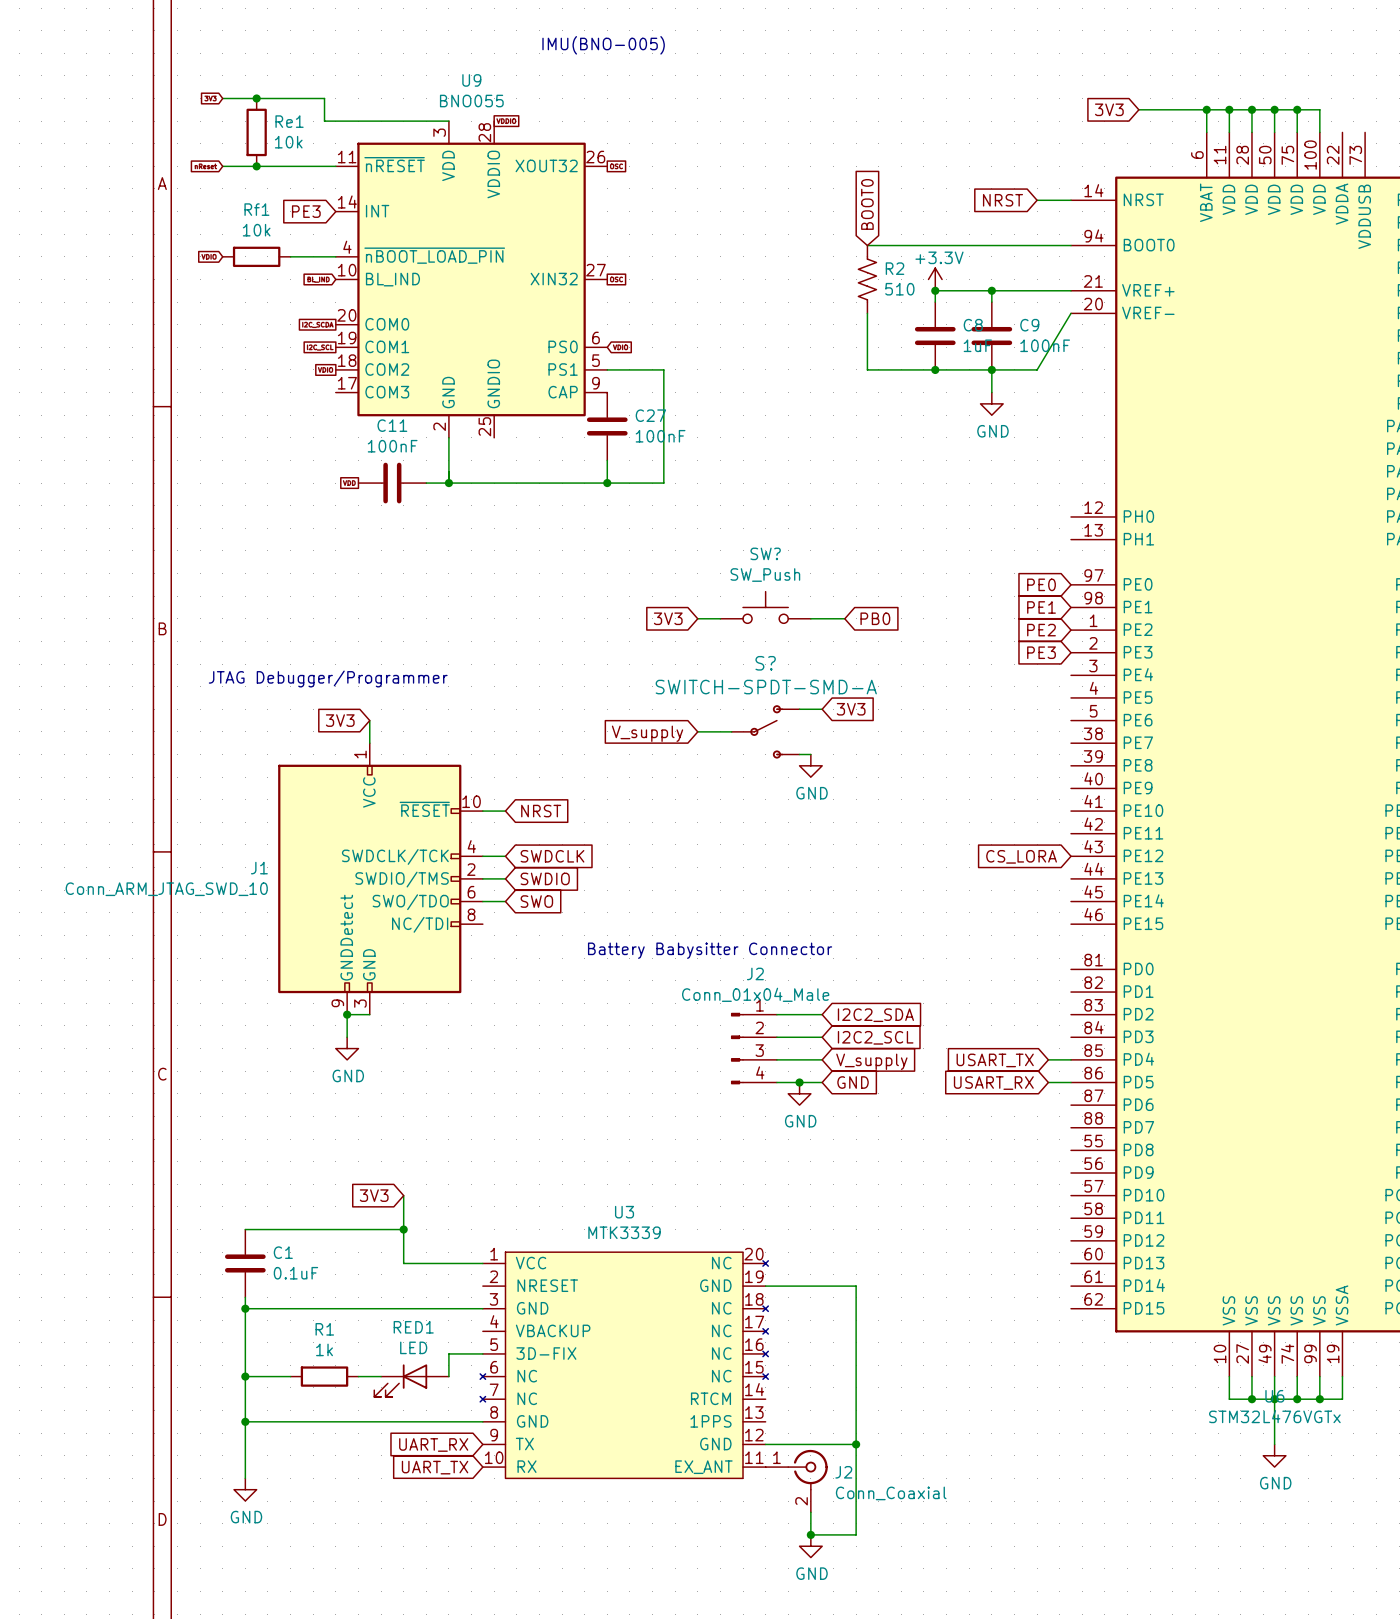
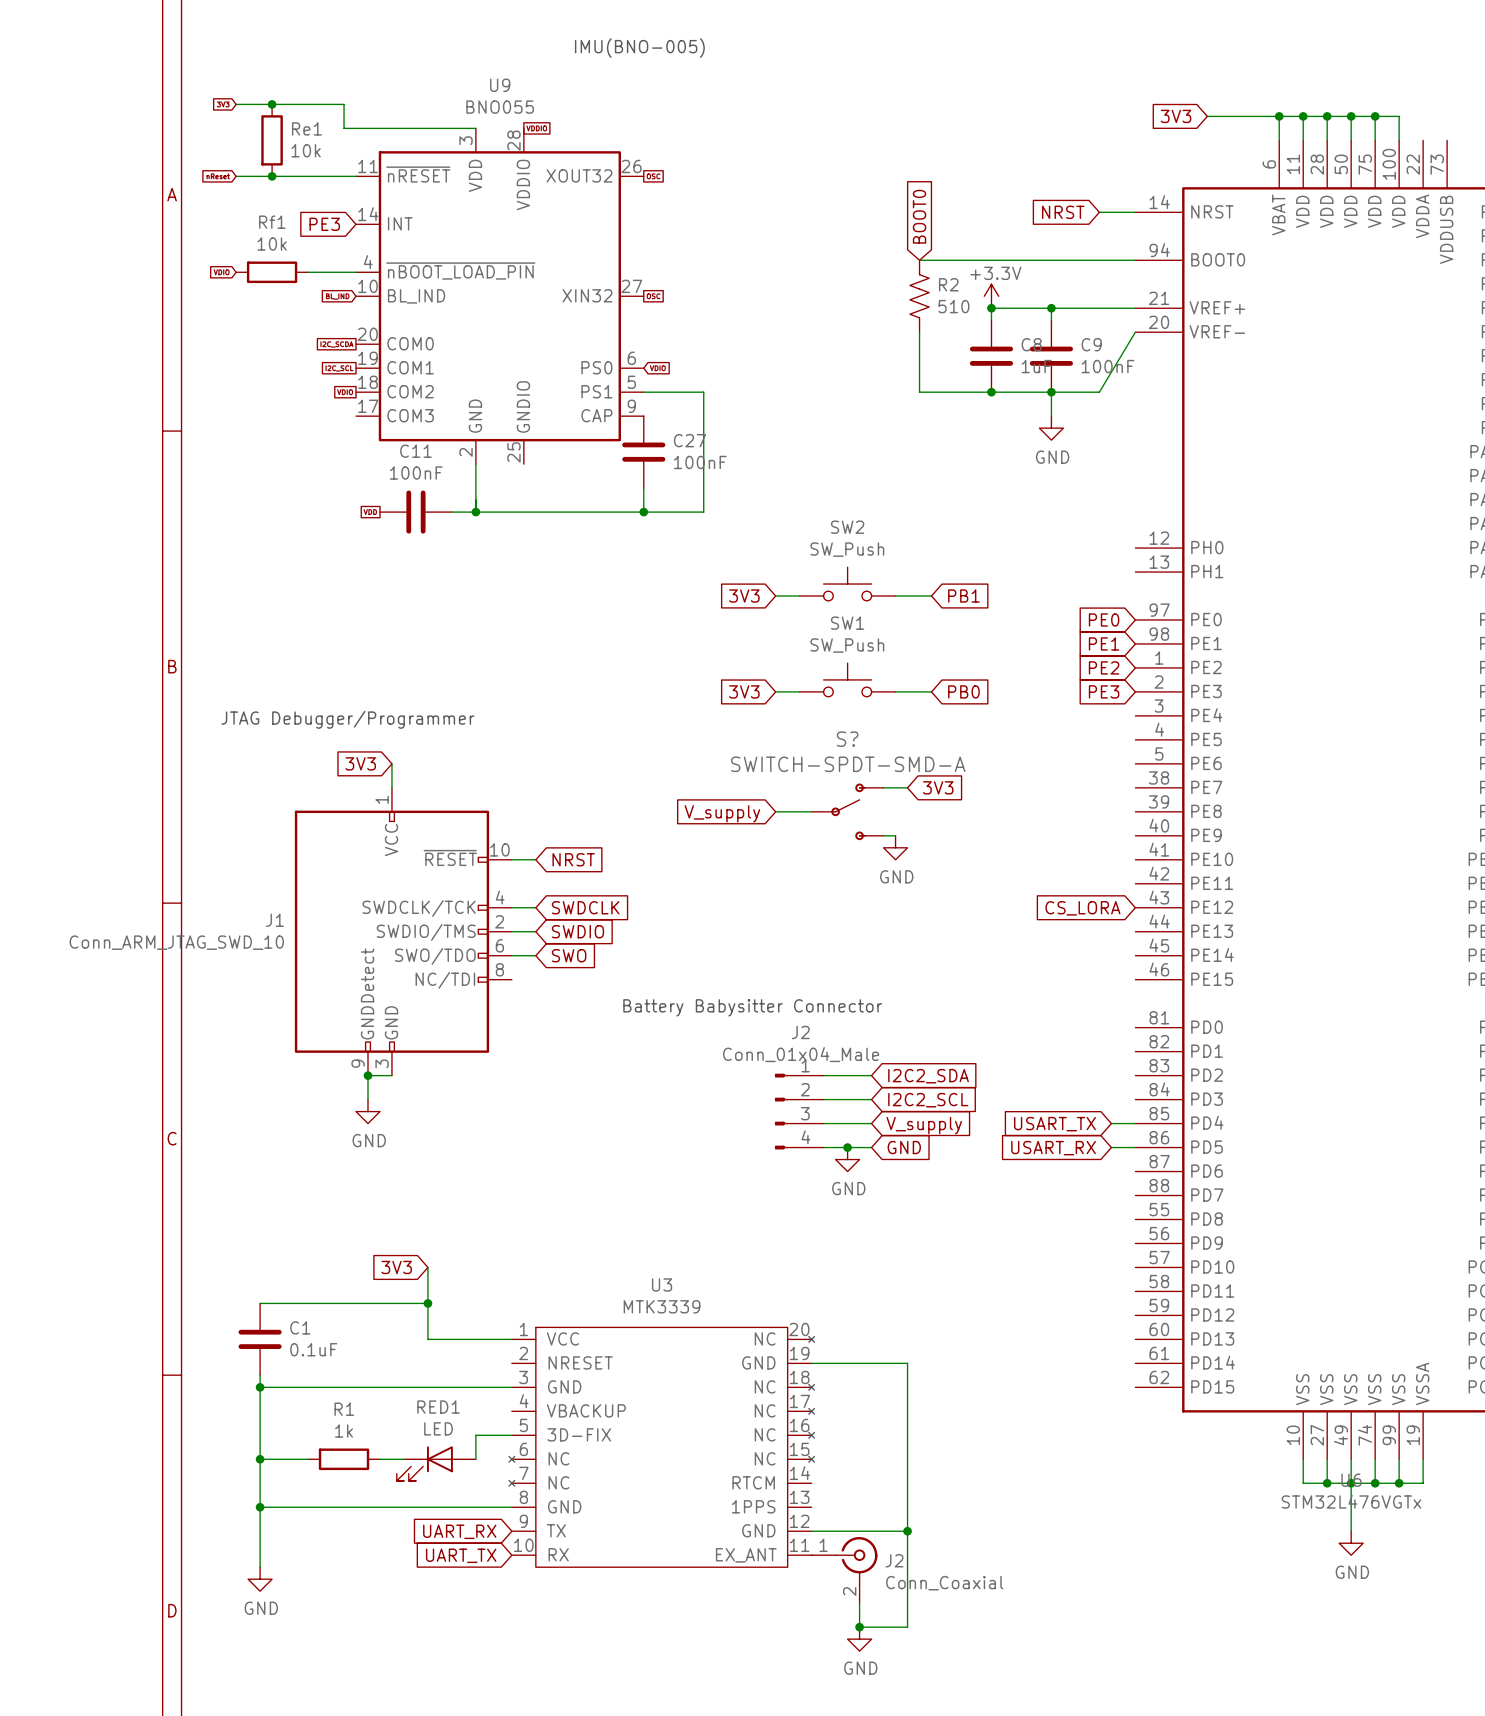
SW2: none -> SW_Push (847, 584)
global label: none -> 3V3 (744, 596)
wire: none -> (775, 596) (799, 596)
wire: none -> (895, 596) (931, 596)
global label: none -> PB1 (963, 596)
SW?: SW_Push (765, 607) -> none
global label: 3V3 (668, 618) -> none
wire: (697, 618) (720, 618) -> (775, 691) (799, 691)
wire: (810, 618) (844, 618) -> (895, 691) (931, 691)
global label position: PB0 (875, 618) -> PB0 (963, 691)
SW1: none -> SW_Push (847, 679)
global label: none -> 3V3 (744, 691)
wire: (799, 709) (822, 709) -> (883, 787) (907, 787)
global label position: 3V3 (851, 709) -> 3V3 (938, 787)
wire: (697, 731) (731, 731) -> (775, 811) (811, 811)
S? position: (765, 731) -> (847, 811)
global label position: V_supply (647, 733) -> V_supply (722, 813)
wire: (799, 754) (810, 754) -> (883, 835) (895, 835)
power symbol position: GND (810, 765) -> GND (895, 847)

